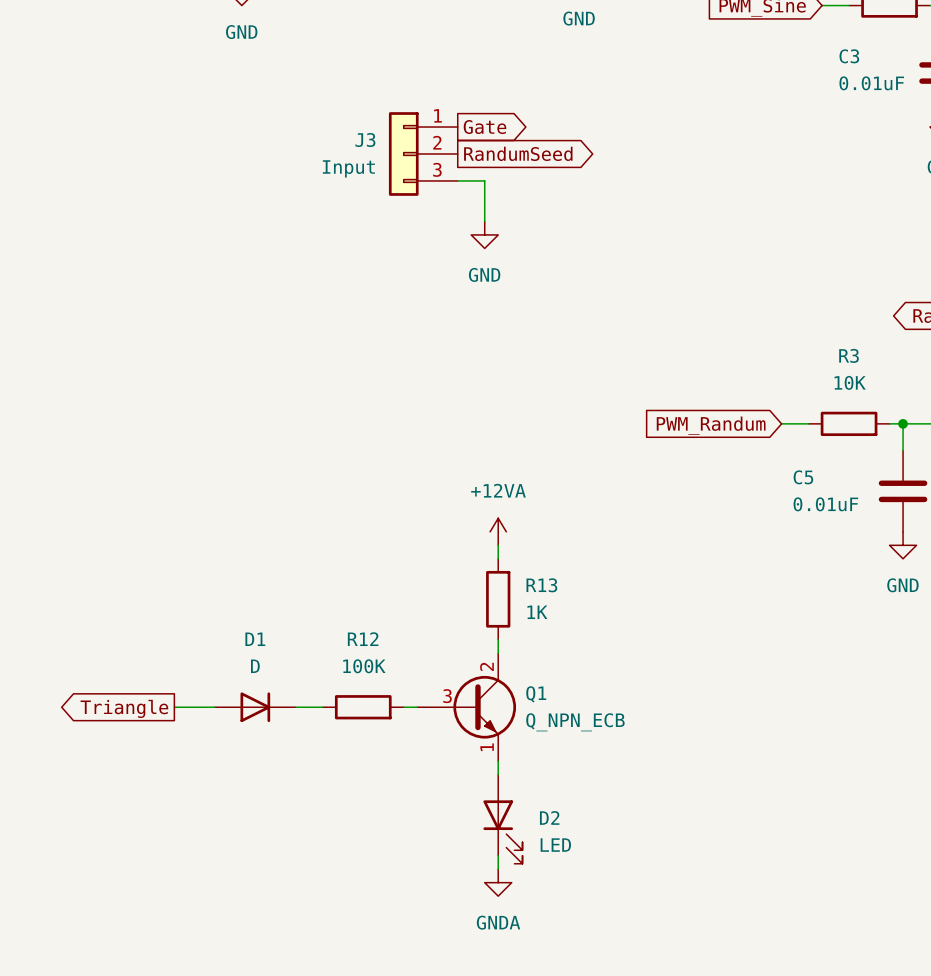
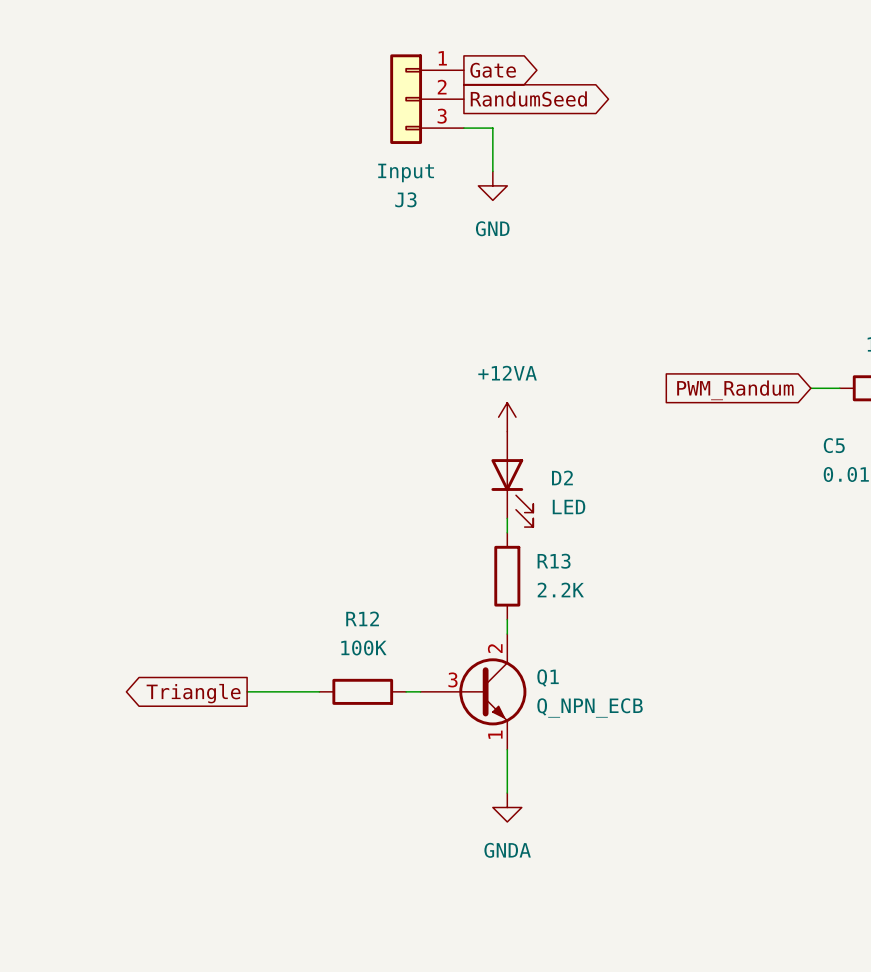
J3 name position: J3 (365, 140) -> J3 (405, 199)
J3 value position: Input (348, 168) -> Input (406, 172)
power symbol position: +12VA (498, 531) -> +12VA (507, 417)
R13 value: 1K (537, 612) -> 2.2K (560, 589)
D1: D (255, 707) -> none
global label position: Triangle (124, 708) -> Triangle (193, 693)
D2 position: (502, 819) -> (512, 479)
wire: (498, 855) (498, 869) -> none
power symbol position: GNDA (498, 882) -> GNDA (507, 807)

